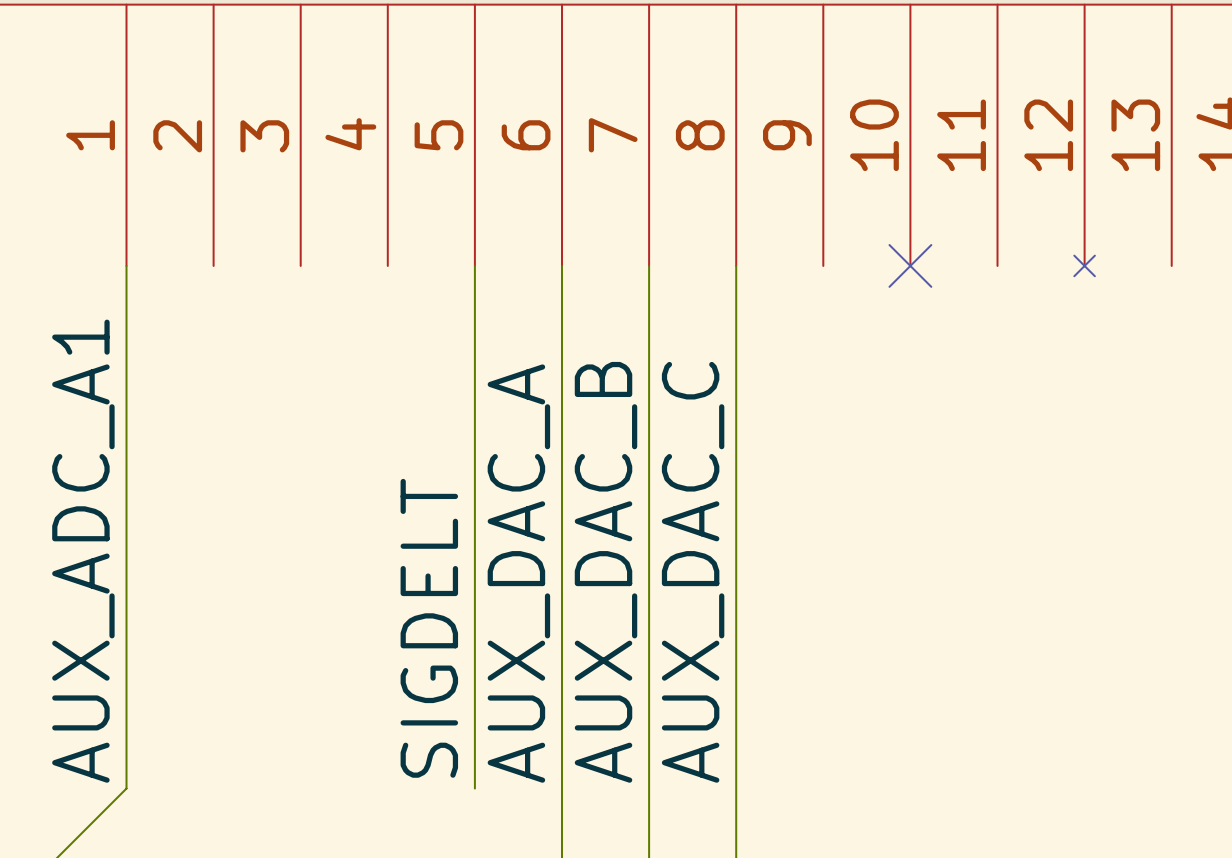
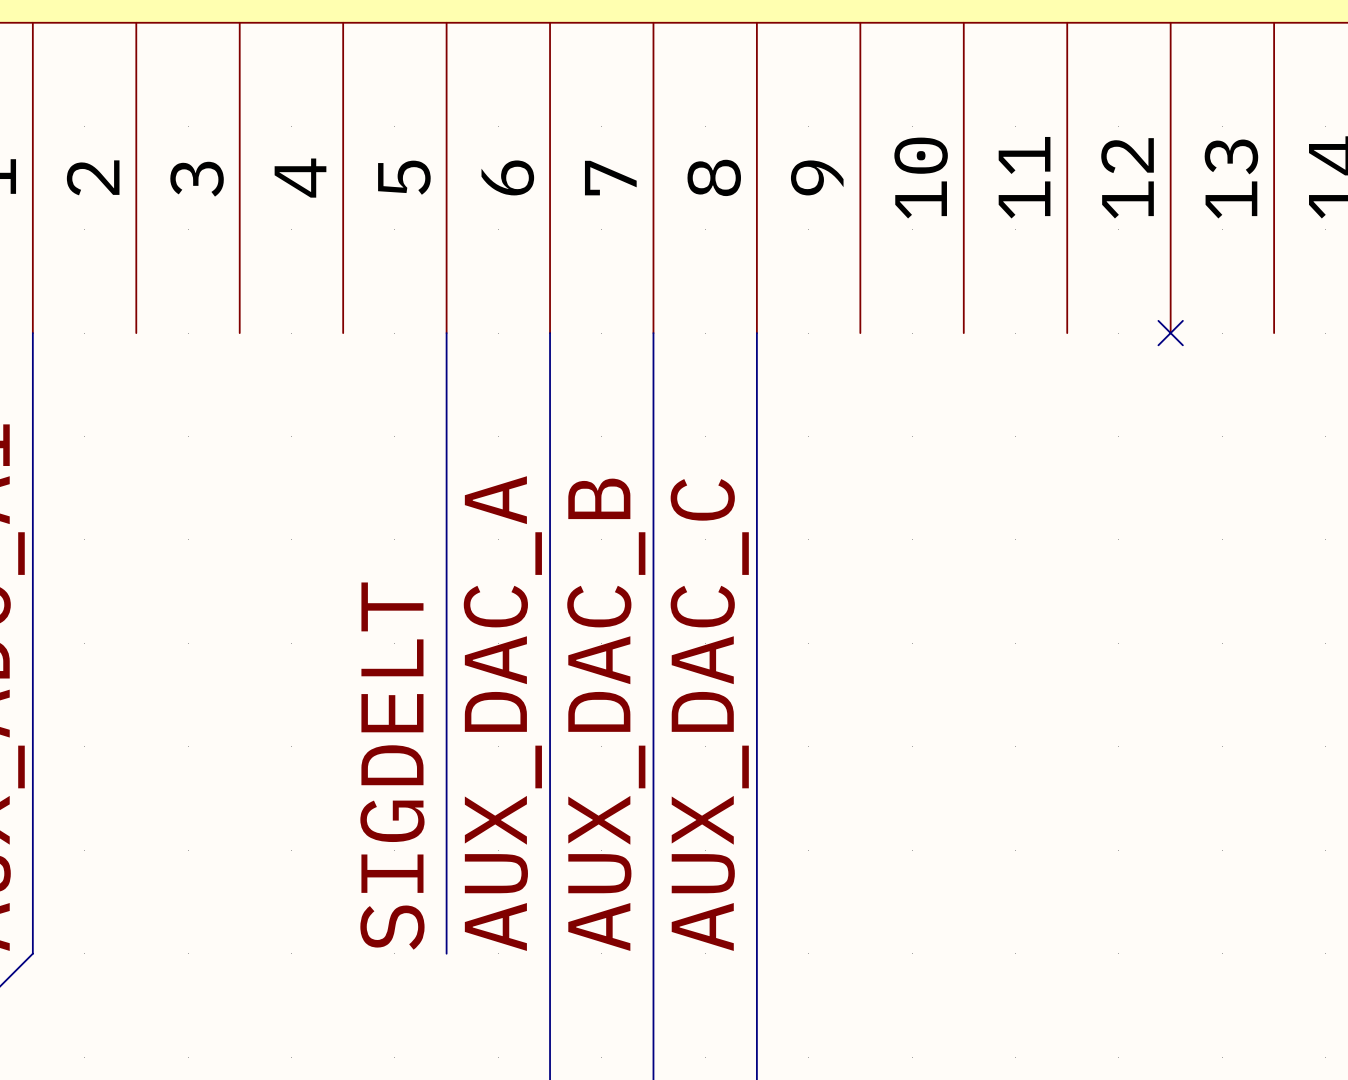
no-connect mark: (910, 265) -> none

